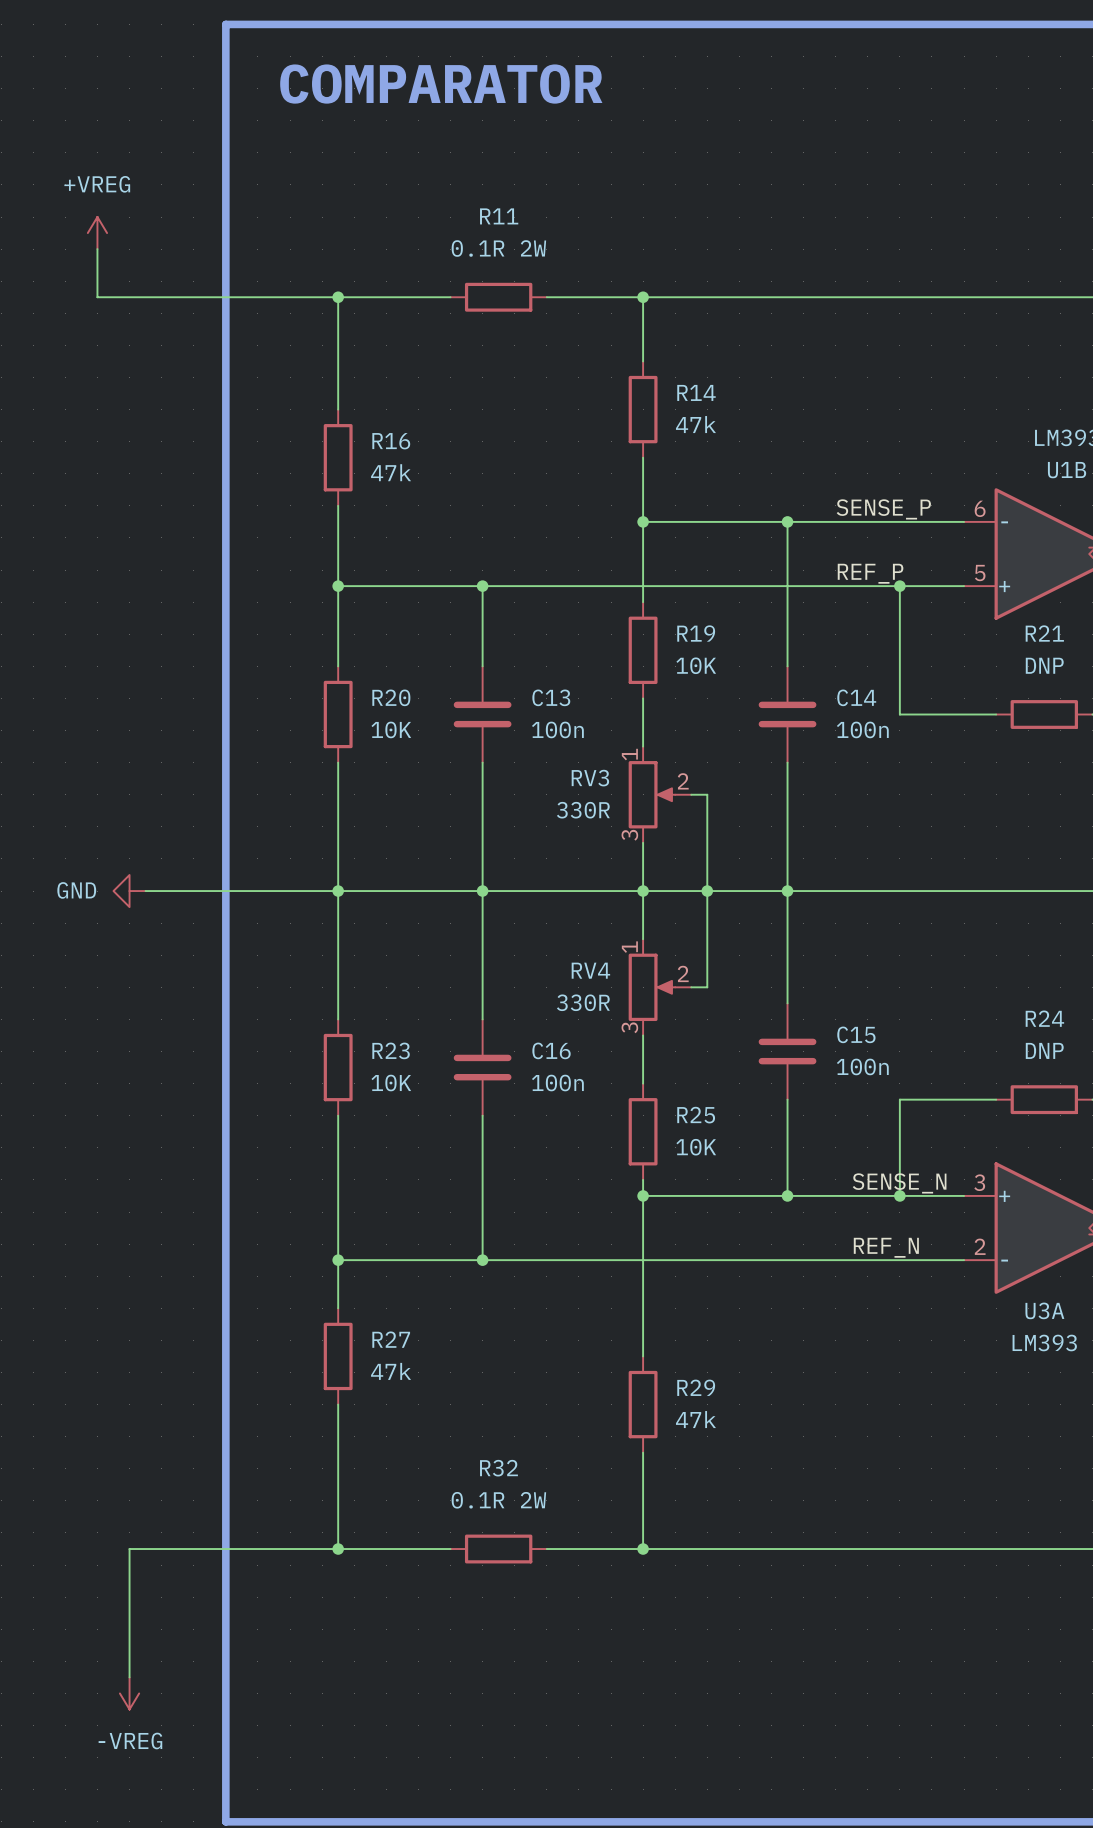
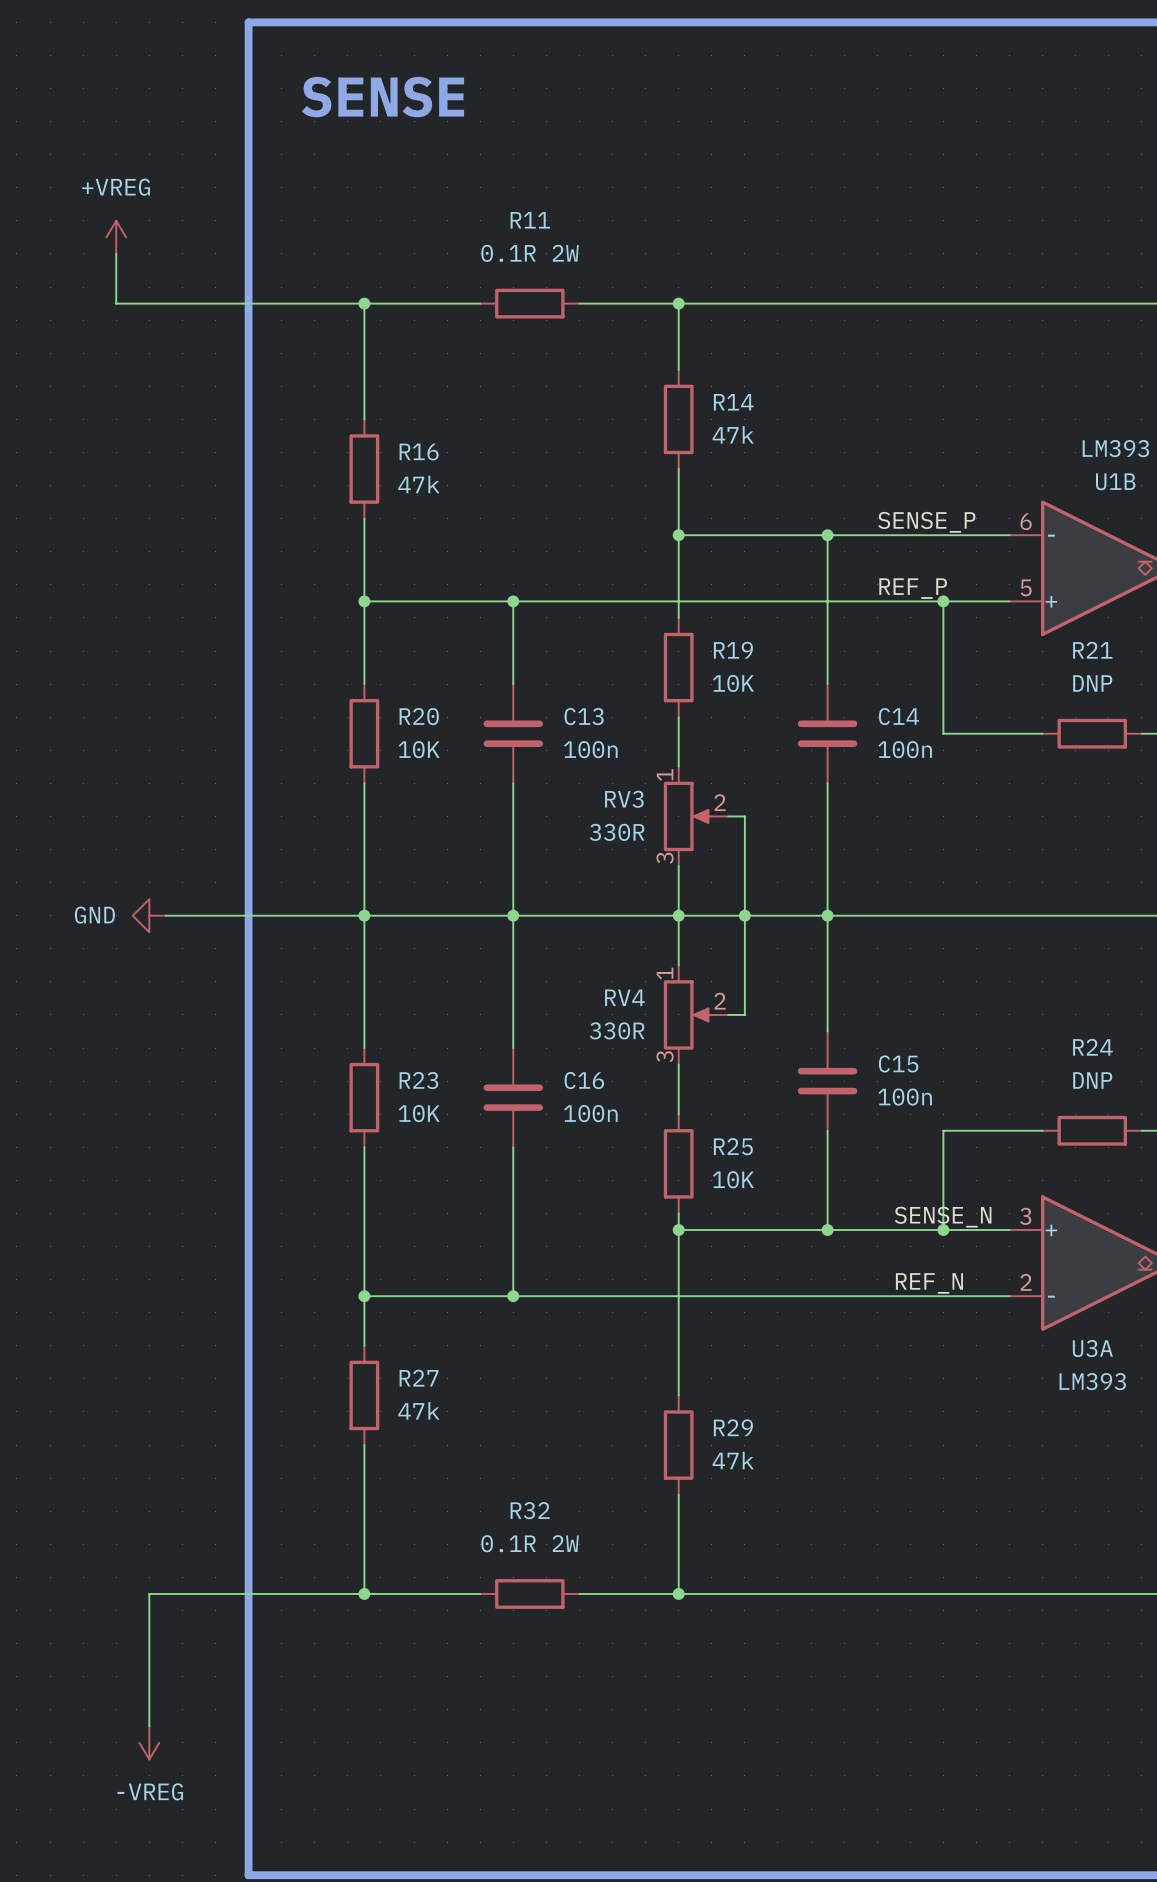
text: COMPARATOR (441, 84) -> none
text: none -> SENSE (383, 97)

